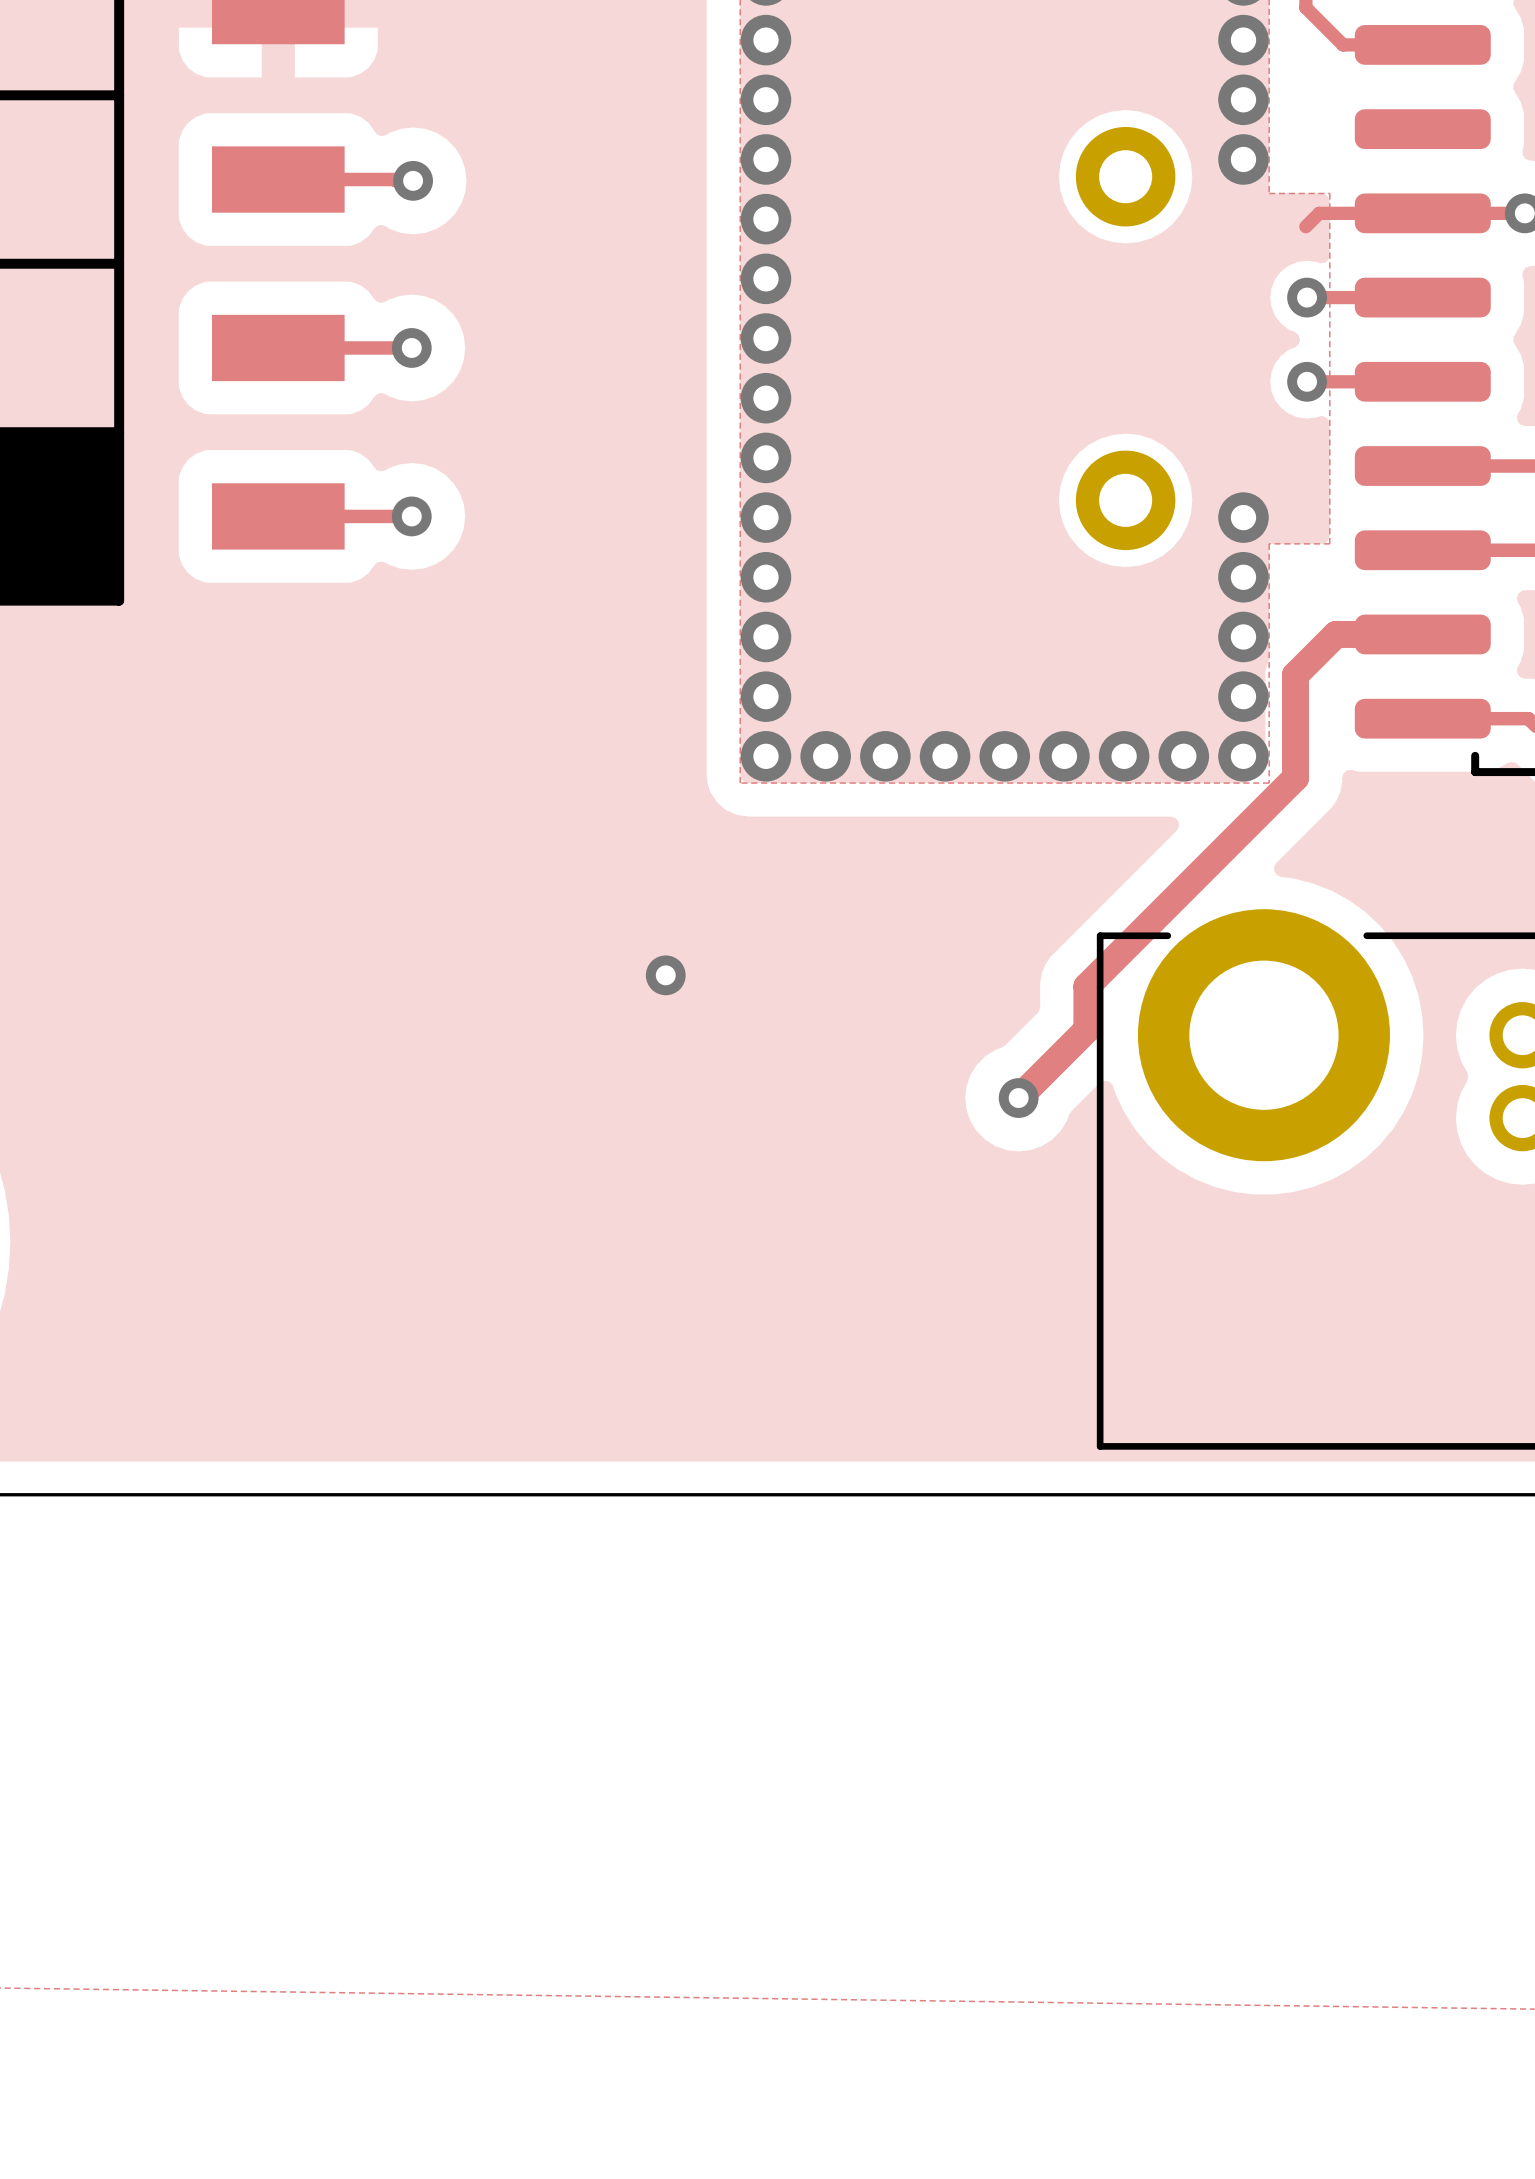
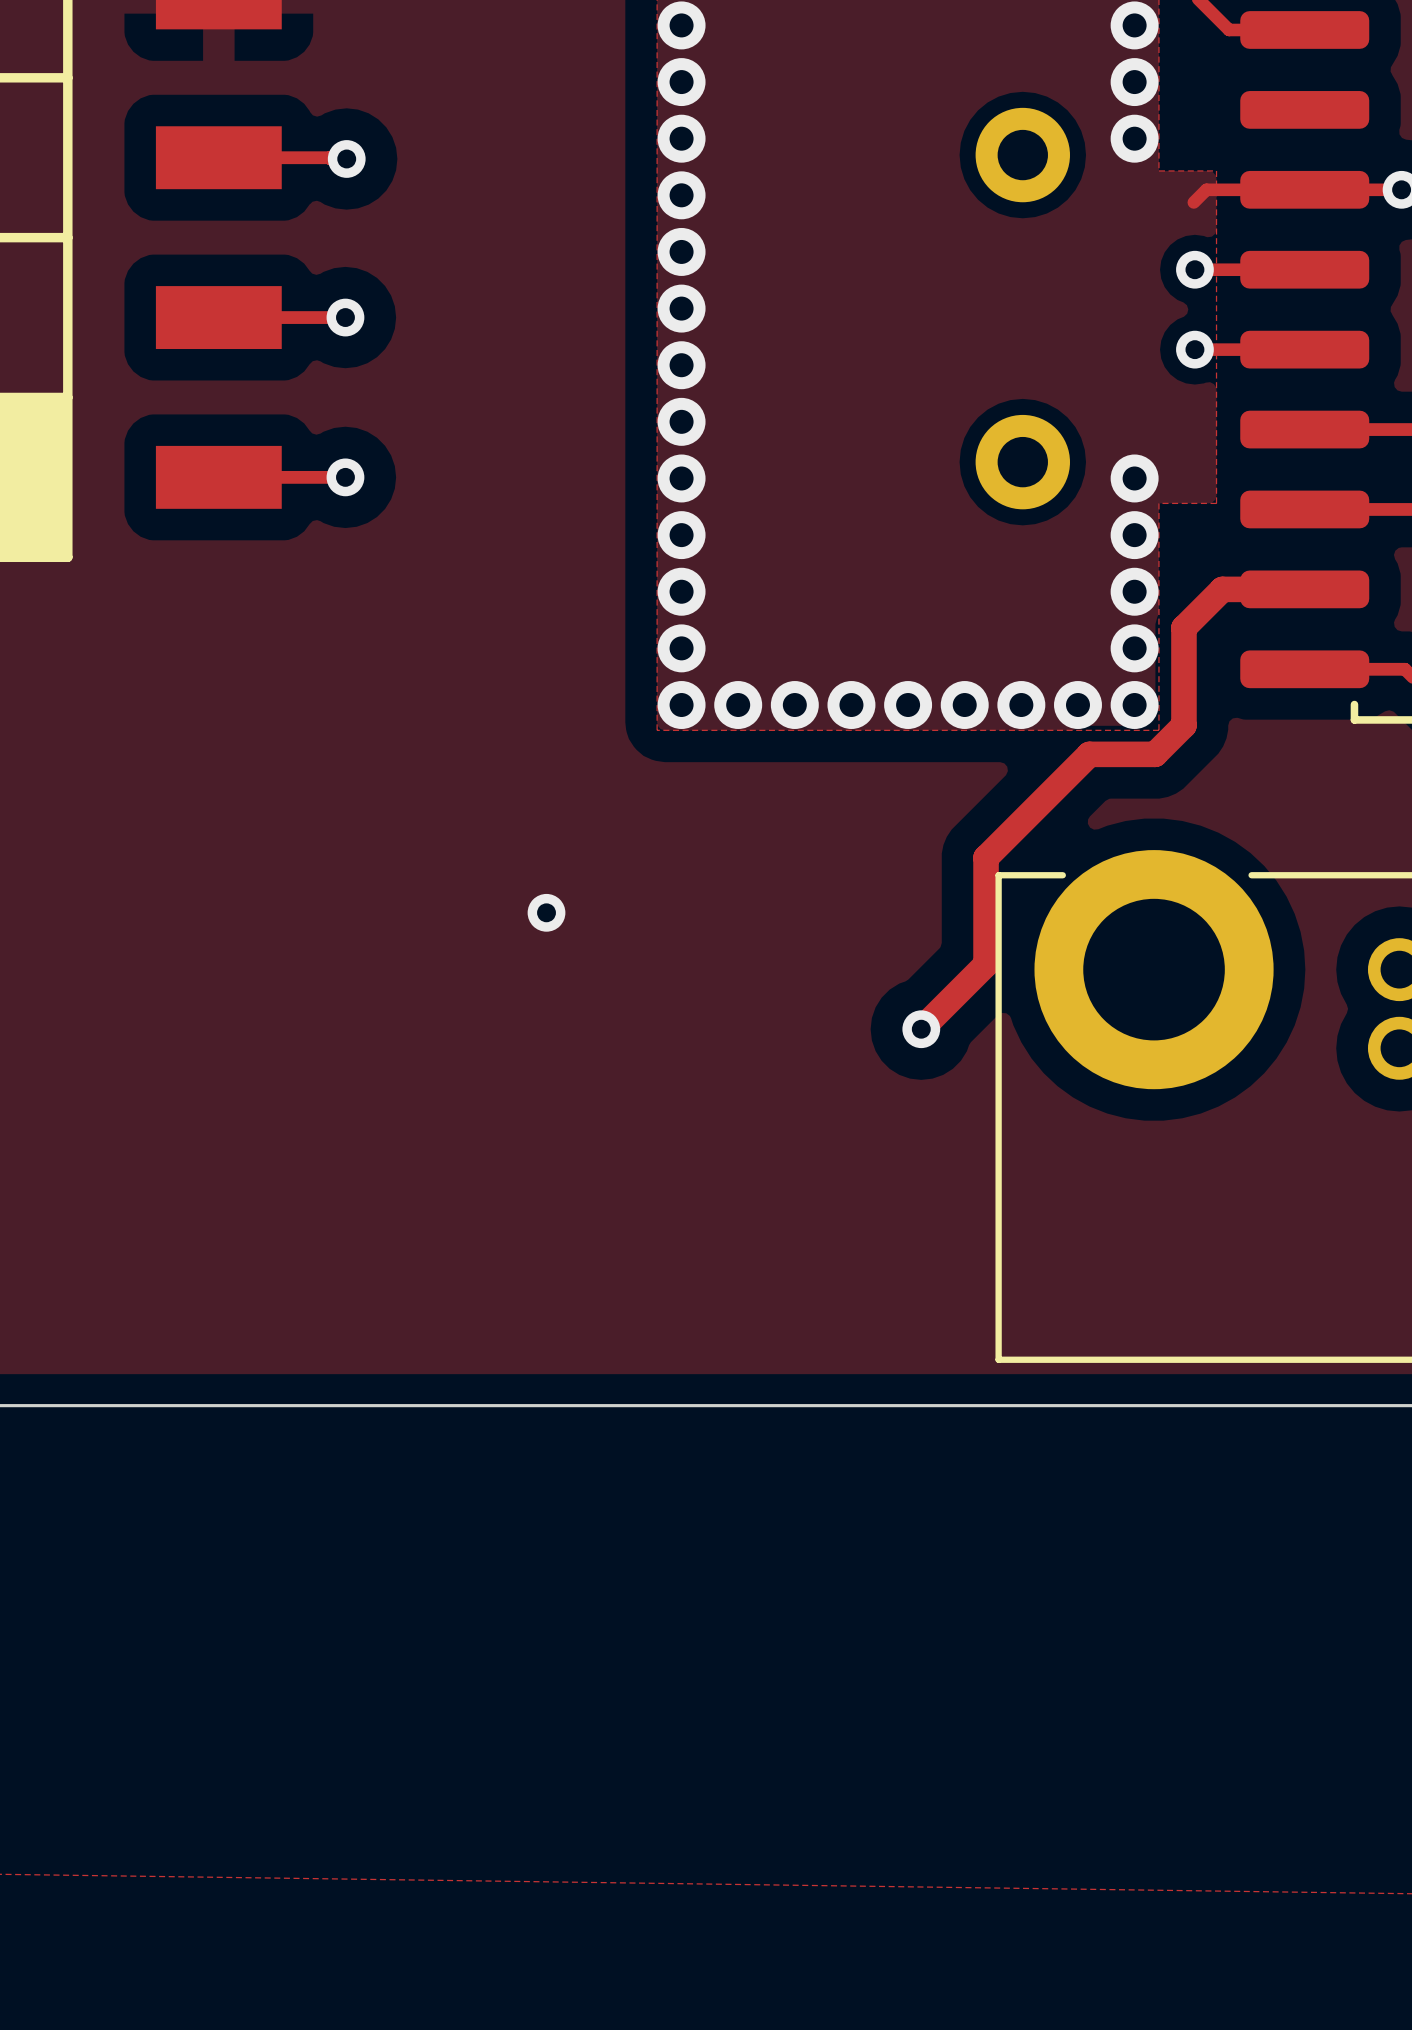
track: (1265, 808) (1086, 986) -> (1155, 754) (1089, 754) (986, 857) (986, 923)
via position: (665, 975) -> (546, 912)

